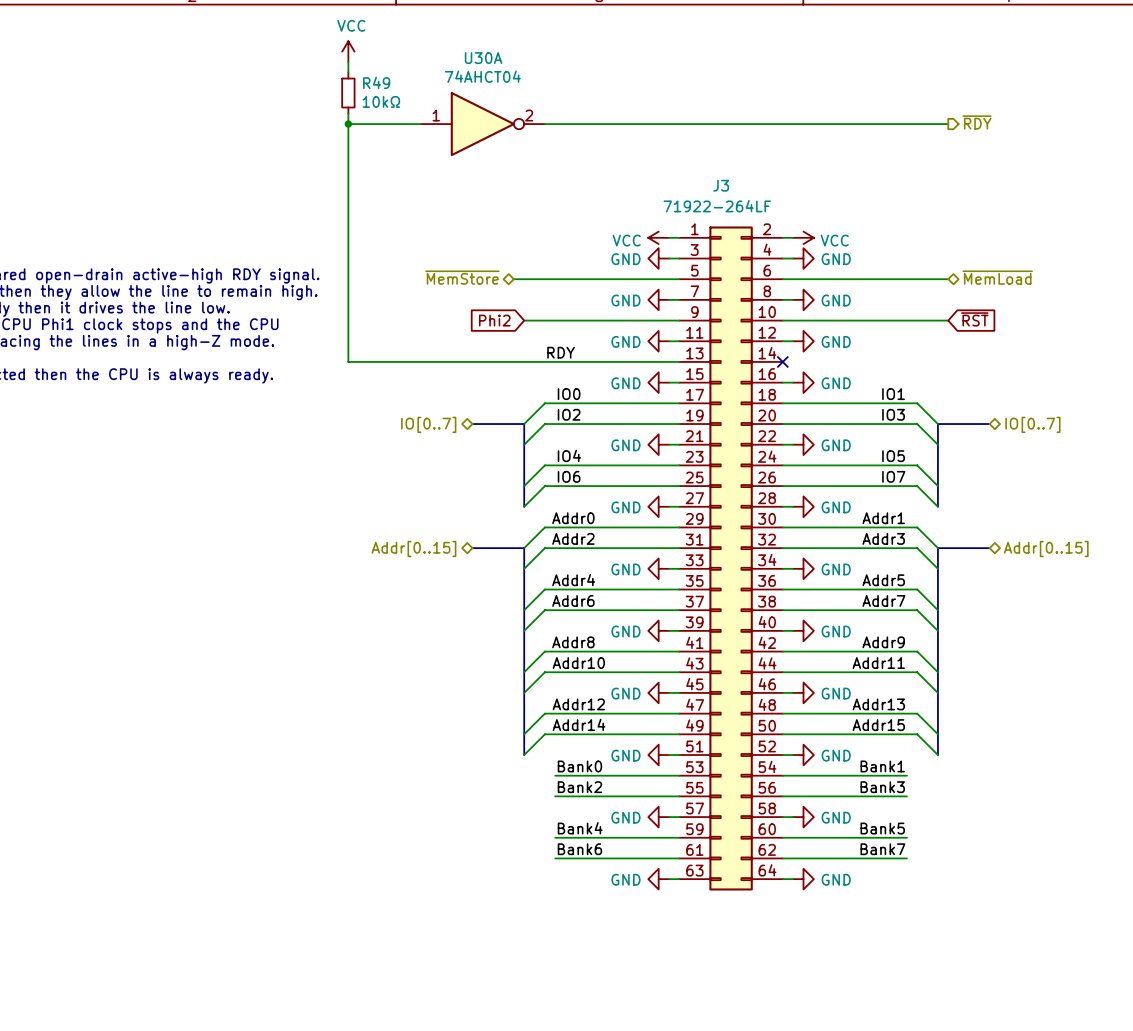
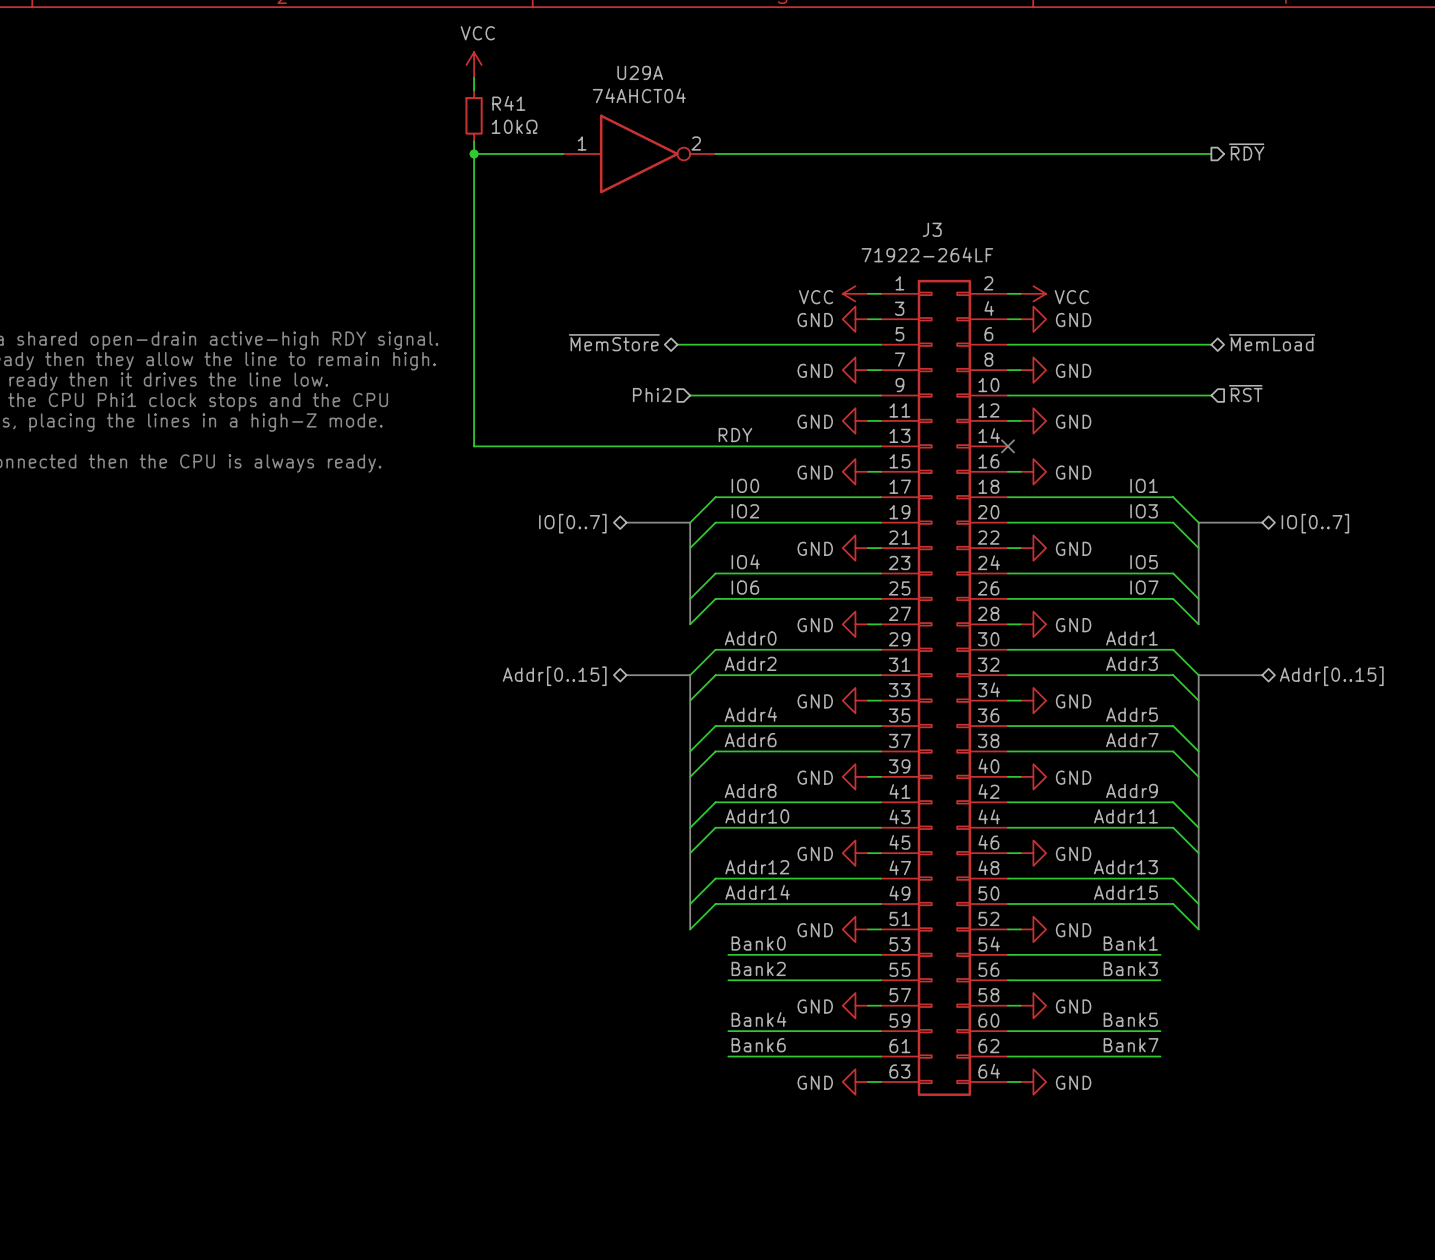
U30A name: U30A (483, 58) -> U29A (640, 72)
R49 name: R49 (376, 82) -> R41 (508, 103)
global label: ~{RST} (974, 319) -> none
hierarchical label: none -> ~{RST} (1245, 393)
hierarchical label: none -> Phi2 (652, 395)
global label: Phi2 (494, 320) -> none

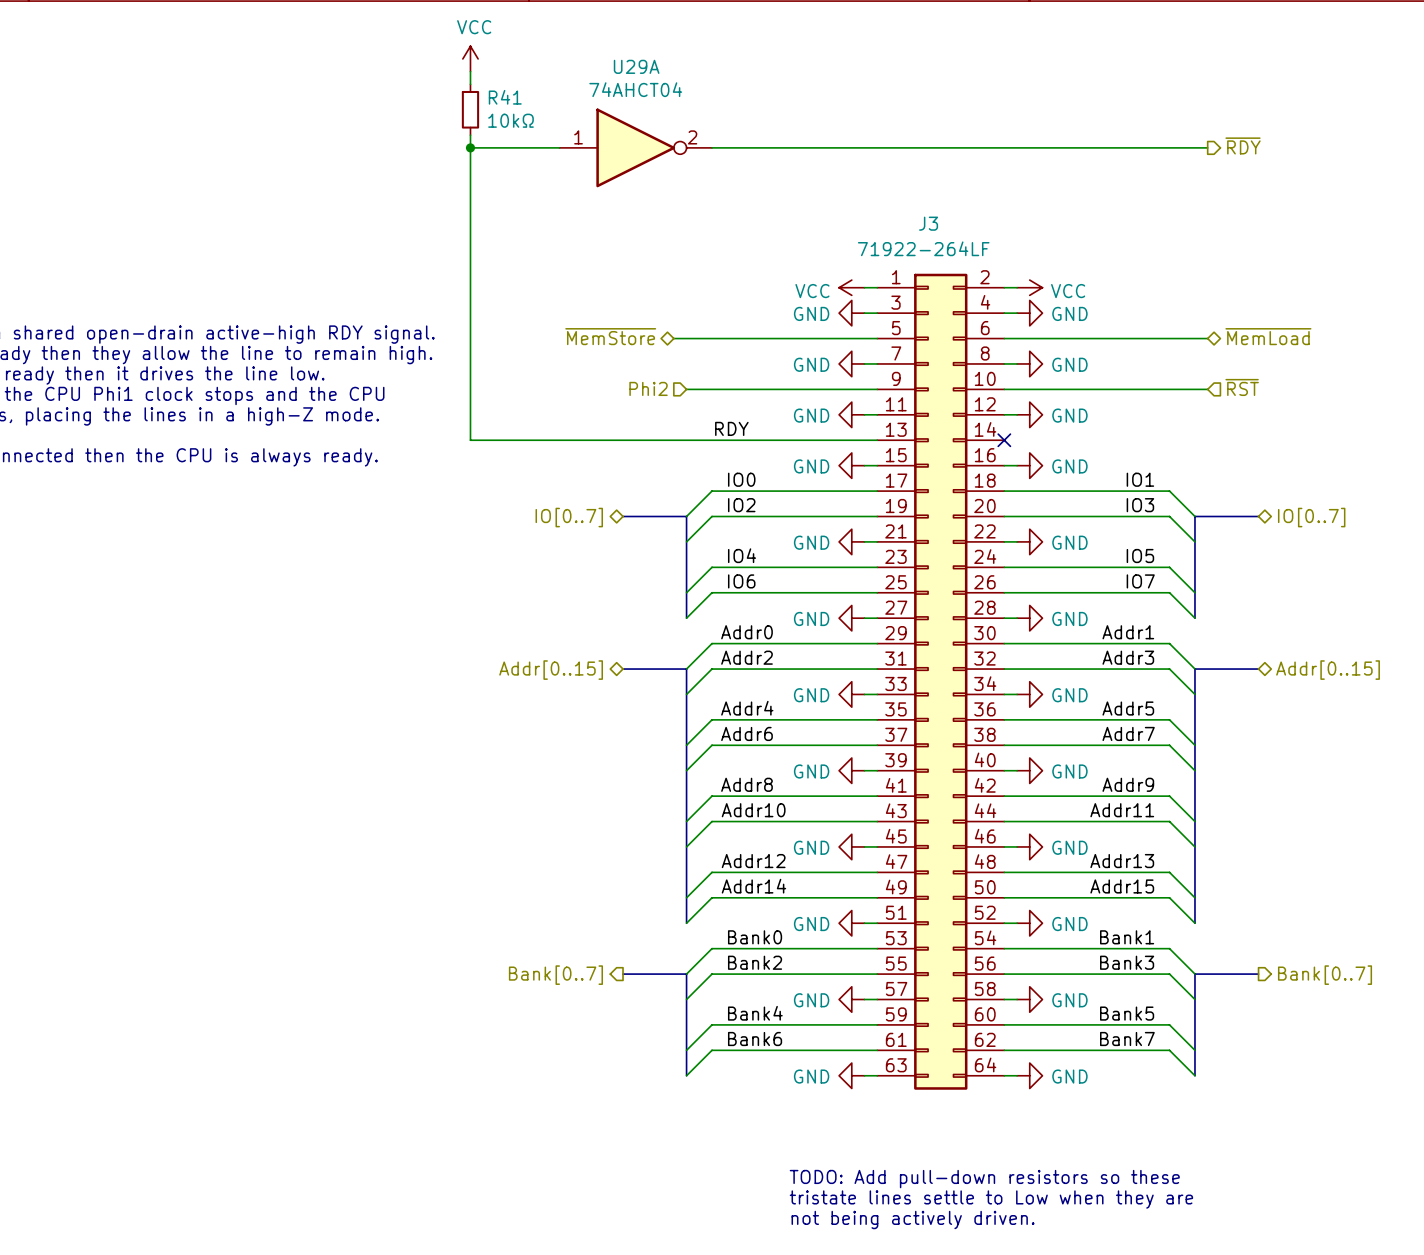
wire: none -> (724, 948) (711, 948) (686, 974)
wire: none -> (1156, 948) (1169, 948) (1194, 974)
bus: none -> (623, 974) (686, 974) (686, 1075)
wire: none -> (724, 974) (711, 974) (686, 999)
wire: none -> (1156, 974) (1169, 974) (1194, 999)
bus: none -> (1258, 974) (1194, 974) (1194, 1075)
hierarchical label: none -> Bank[0..7] (555, 975)
hierarchical label: none -> Bank[0..7] (1325, 975)
wire: none -> (724, 1024) (711, 1024) (686, 1050)
wire: none -> (1156, 1024) (1169, 1024) (1194, 1050)
wire: none -> (724, 1050) (711, 1050) (686, 1075)
wire: none -> (1156, 1050) (1169, 1050) (1194, 1075)
text: none -> TODO: Add pull-down resistors so these (984, 1179)
text: none -> tristate lines settle to Low when they are (991, 1199)
text: none -> not being actively driven. (913, 1219)

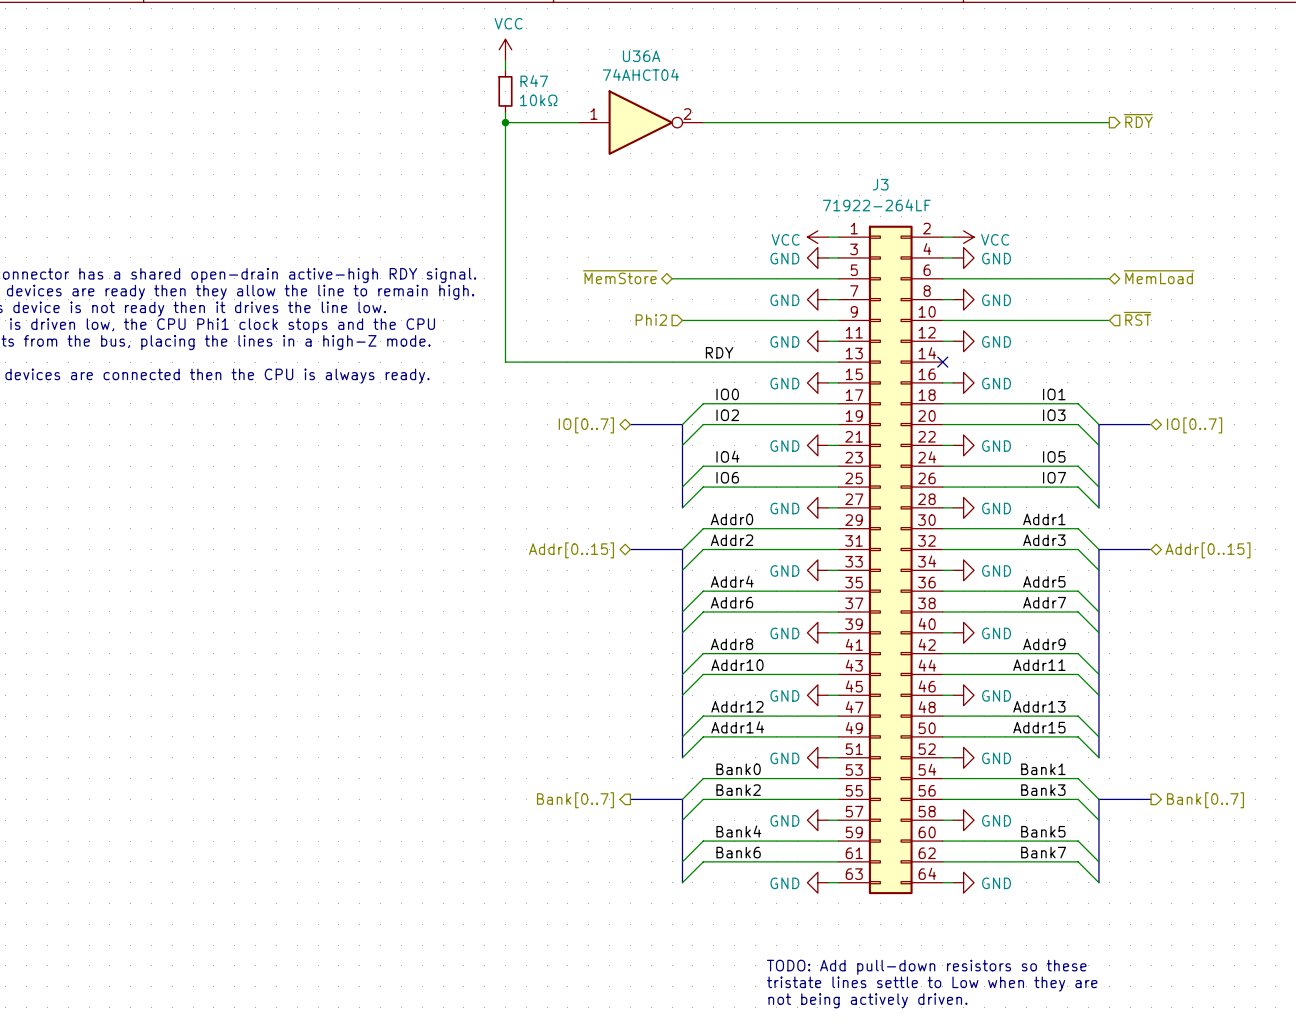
U29A name: U29A (636, 66) -> U36A (641, 56)
R41 name: R41 (505, 97) -> R47 (534, 81)

